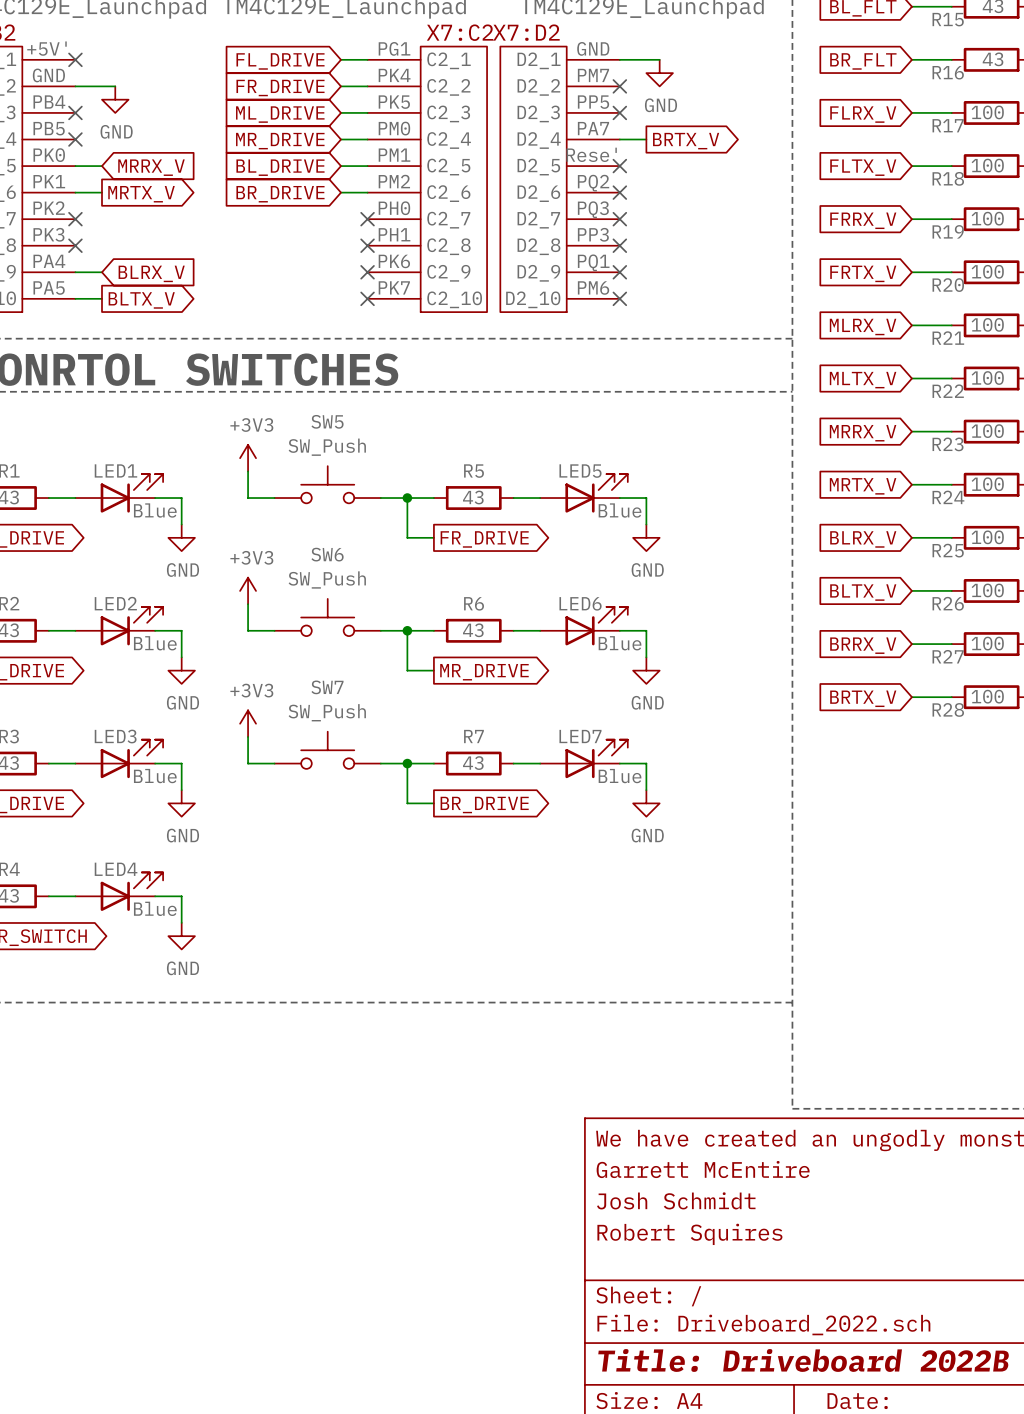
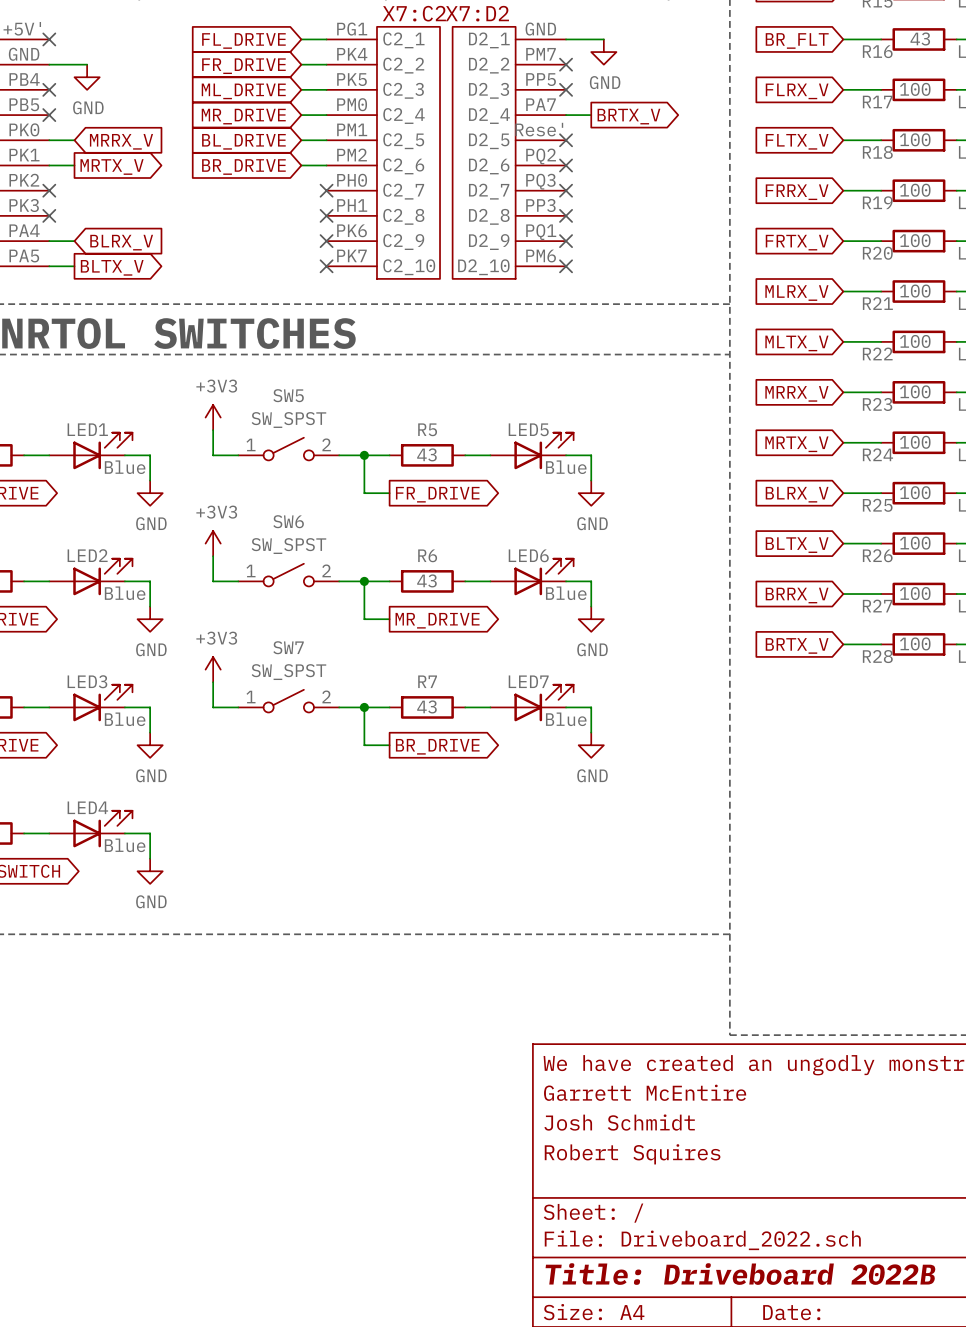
SW5 value: SW_Push (327, 447) -> SW_SPST (288, 420)
SW5 symbol: [274, 466, 381, 504] -> [238, 437, 340, 461]
SW6 value: SW_Push (327, 579) -> SW_SPST (288, 546)
SW6 symbol: [274, 598, 381, 637] -> [238, 563, 340, 587]
SW7 value: SW_Push (327, 712) -> SW_SPST (288, 672)
SW7 symbol: [274, 731, 381, 769] -> [238, 689, 340, 713]

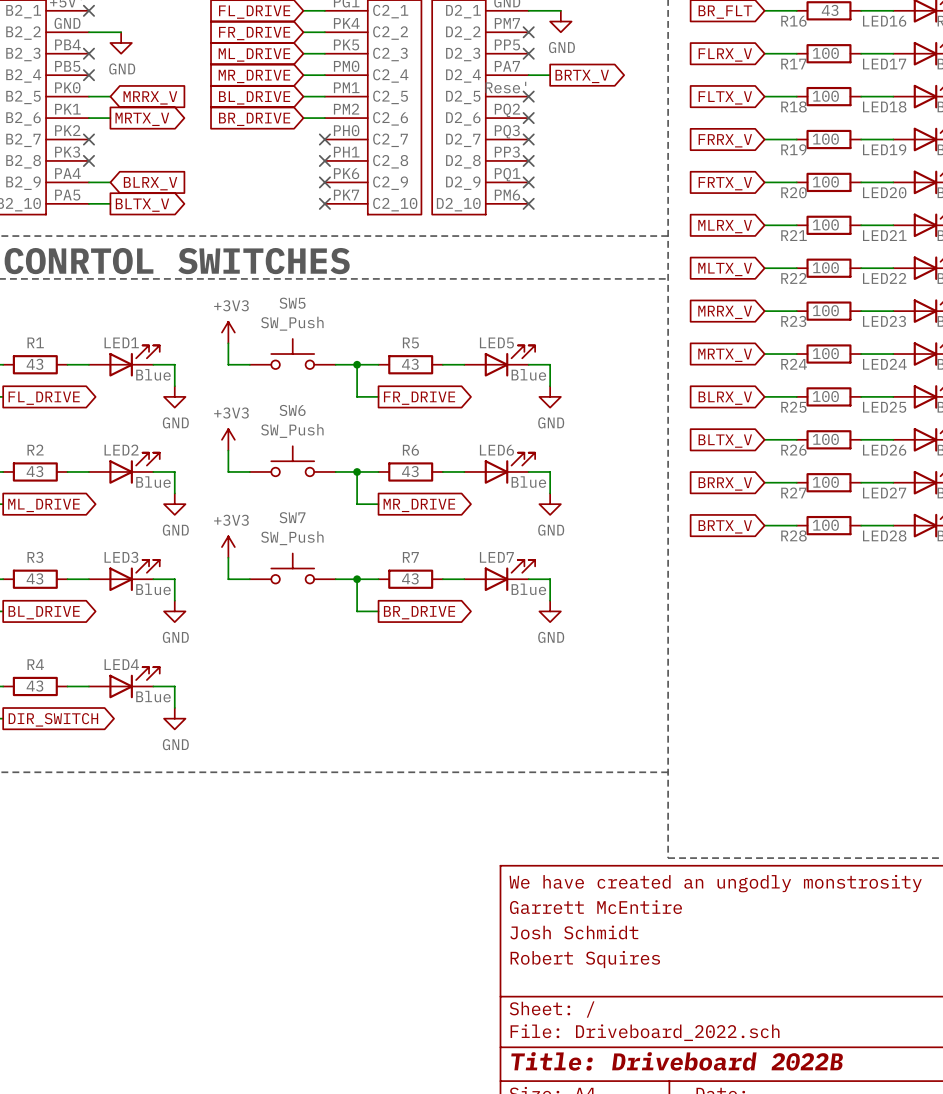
SW5 value: SW_SPST (288, 420) -> SW_Push (292, 323)
SW5 symbol: [238, 437, 340, 461] -> [249, 338, 336, 370]
SW6 value: SW_SPST (288, 546) -> SW_Push (292, 430)
SW6 symbol: [238, 563, 340, 587] -> [249, 446, 336, 477]
SW7 value: SW_SPST (288, 672) -> SW_Push (292, 538)
SW7 symbol: [238, 689, 340, 713] -> [249, 553, 336, 584]

